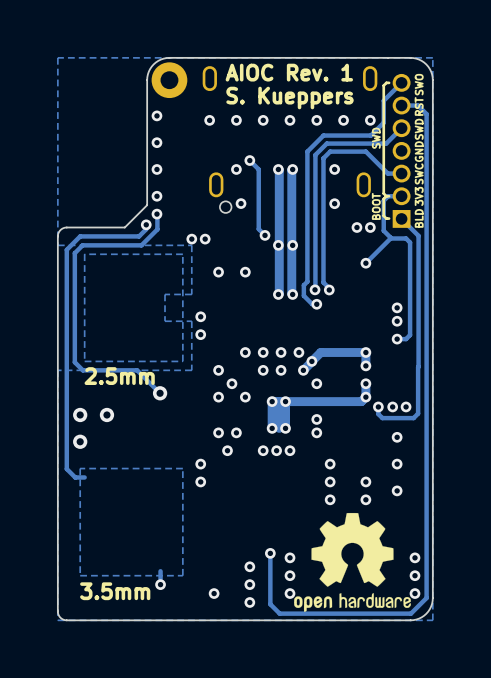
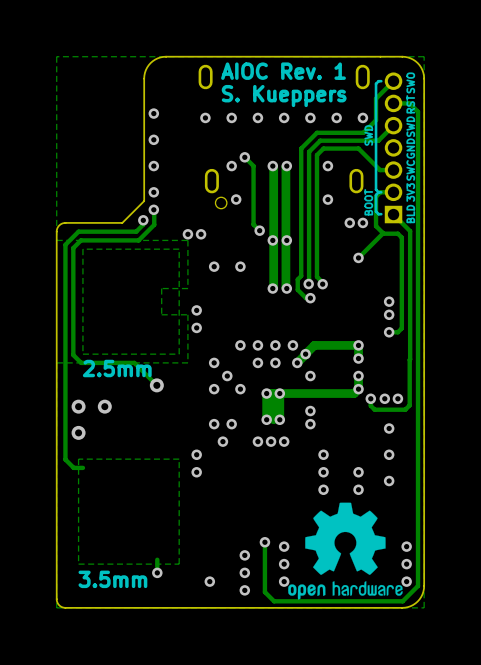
part: (169, 80) -> none

